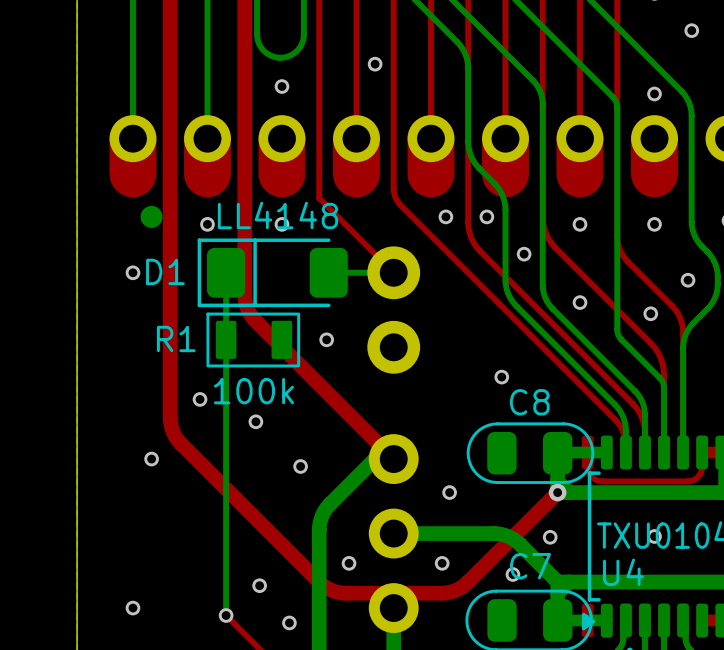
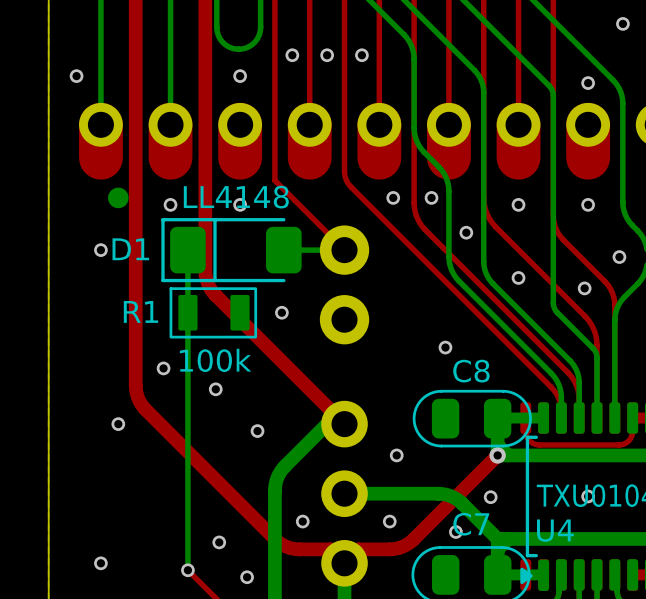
via: none -> (292, 55)
via: none -> (361, 55)
via: none -> (76, 76)

